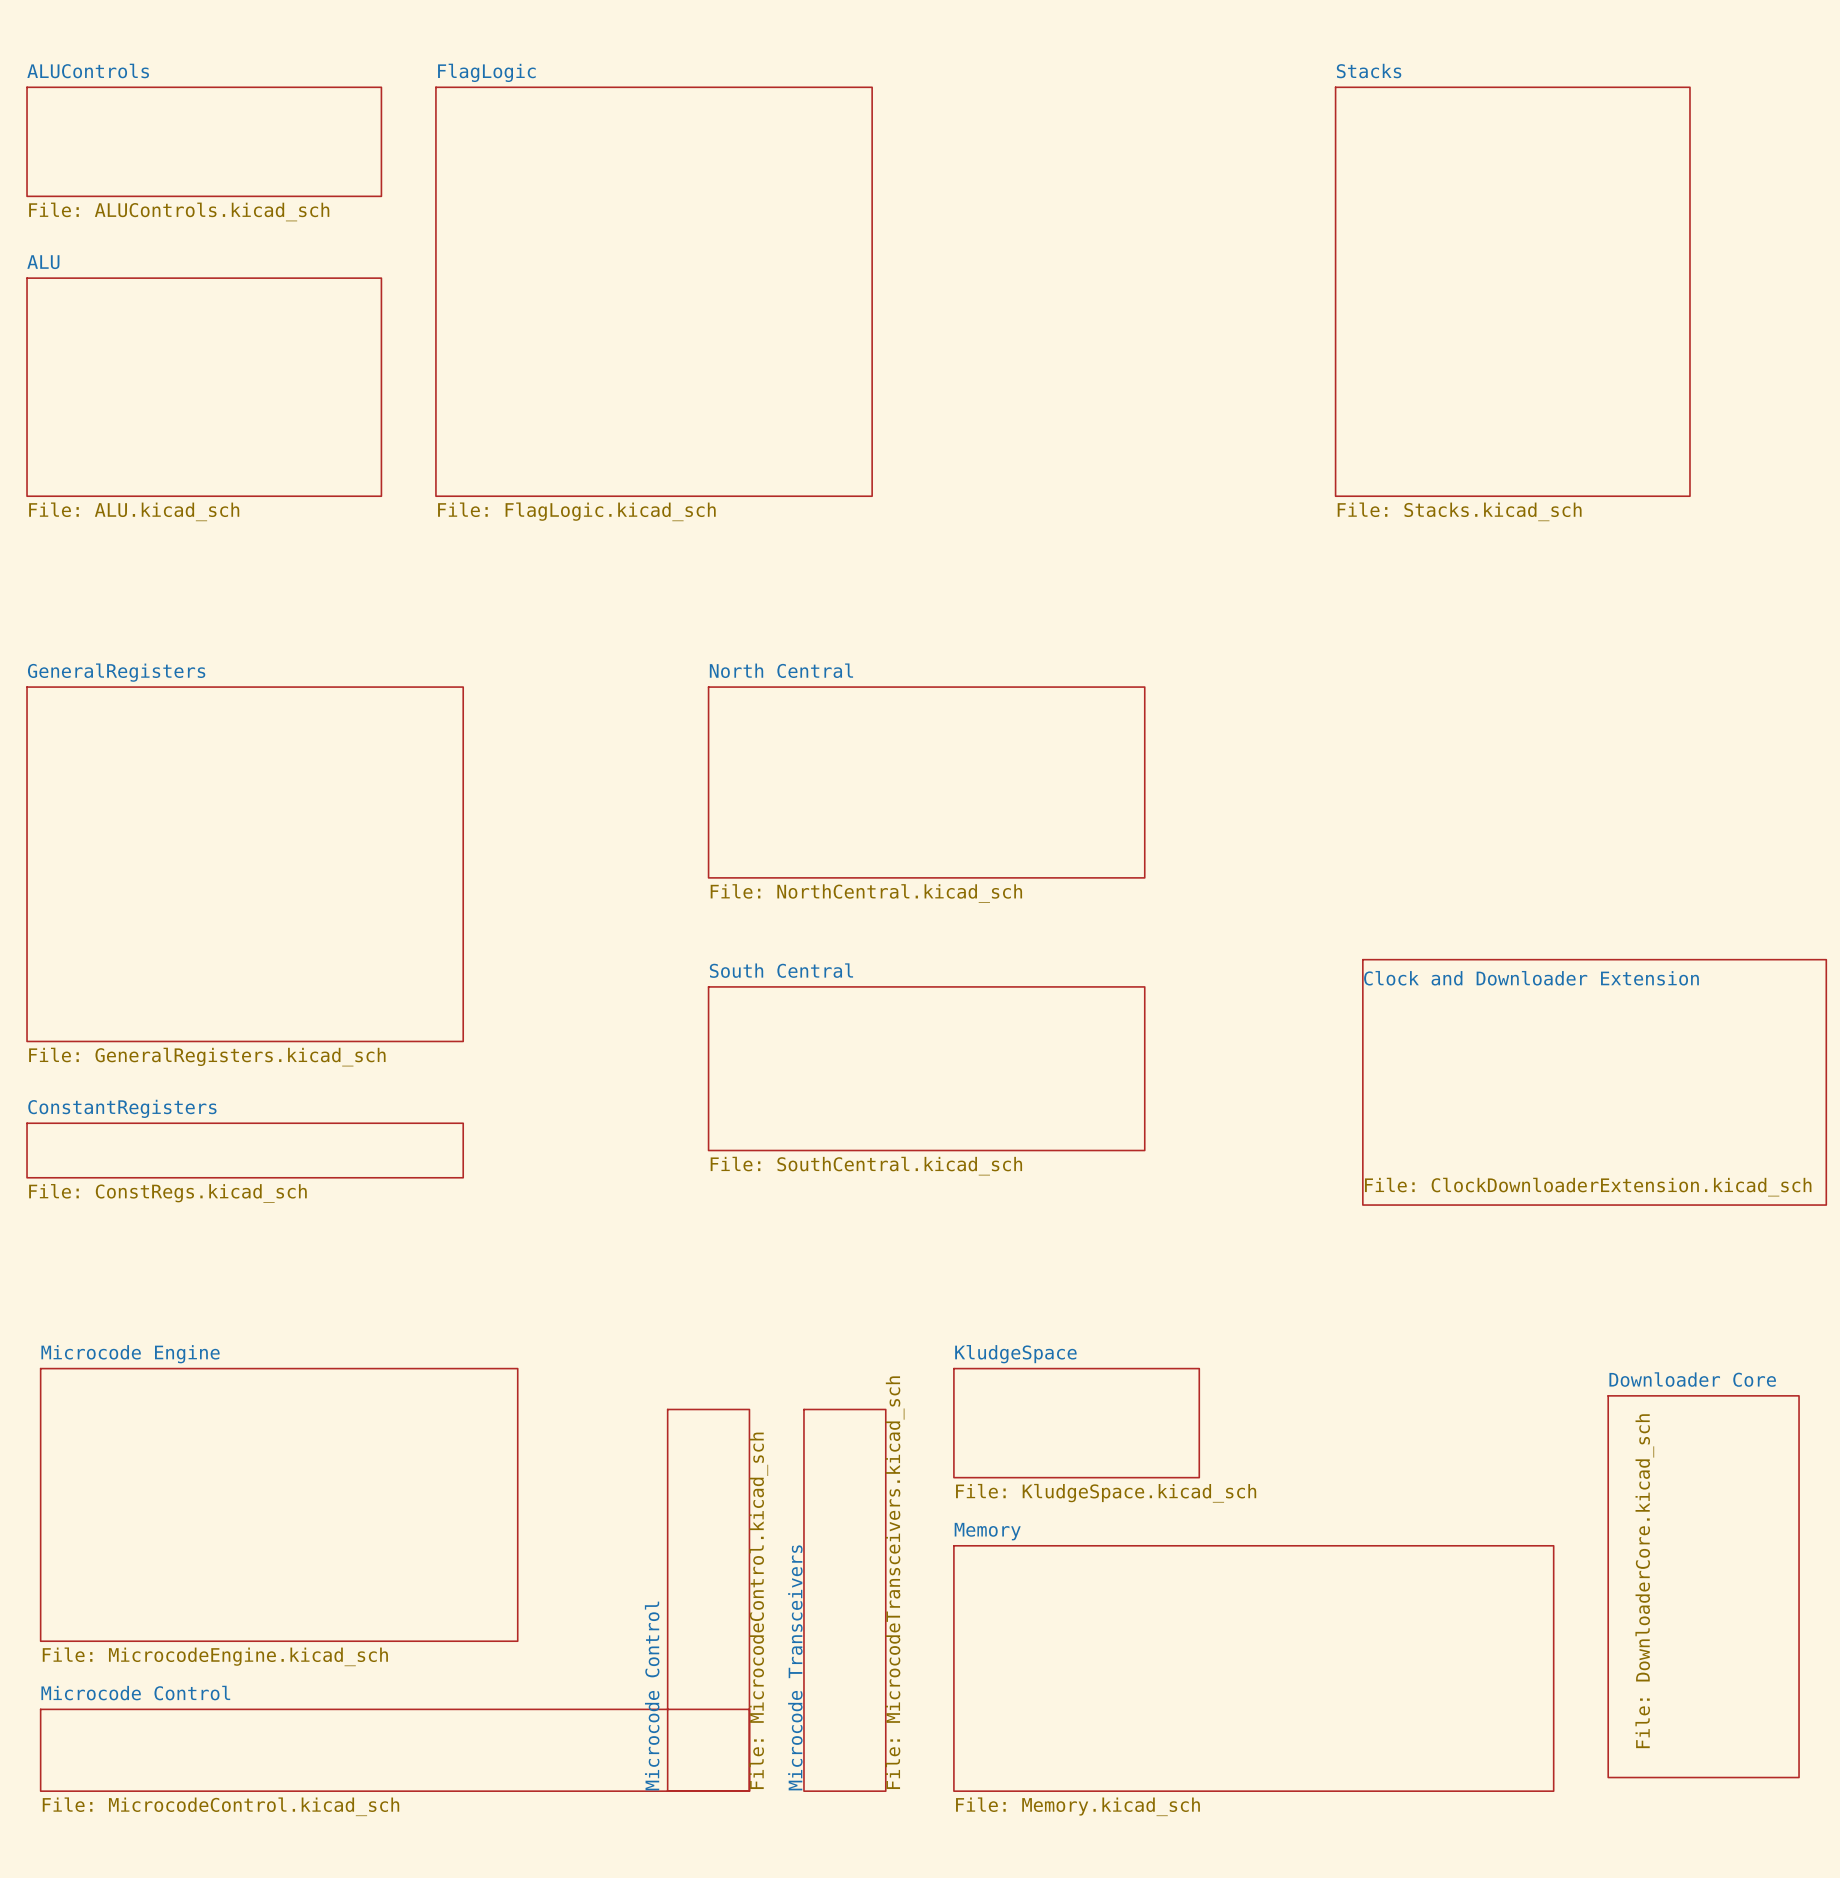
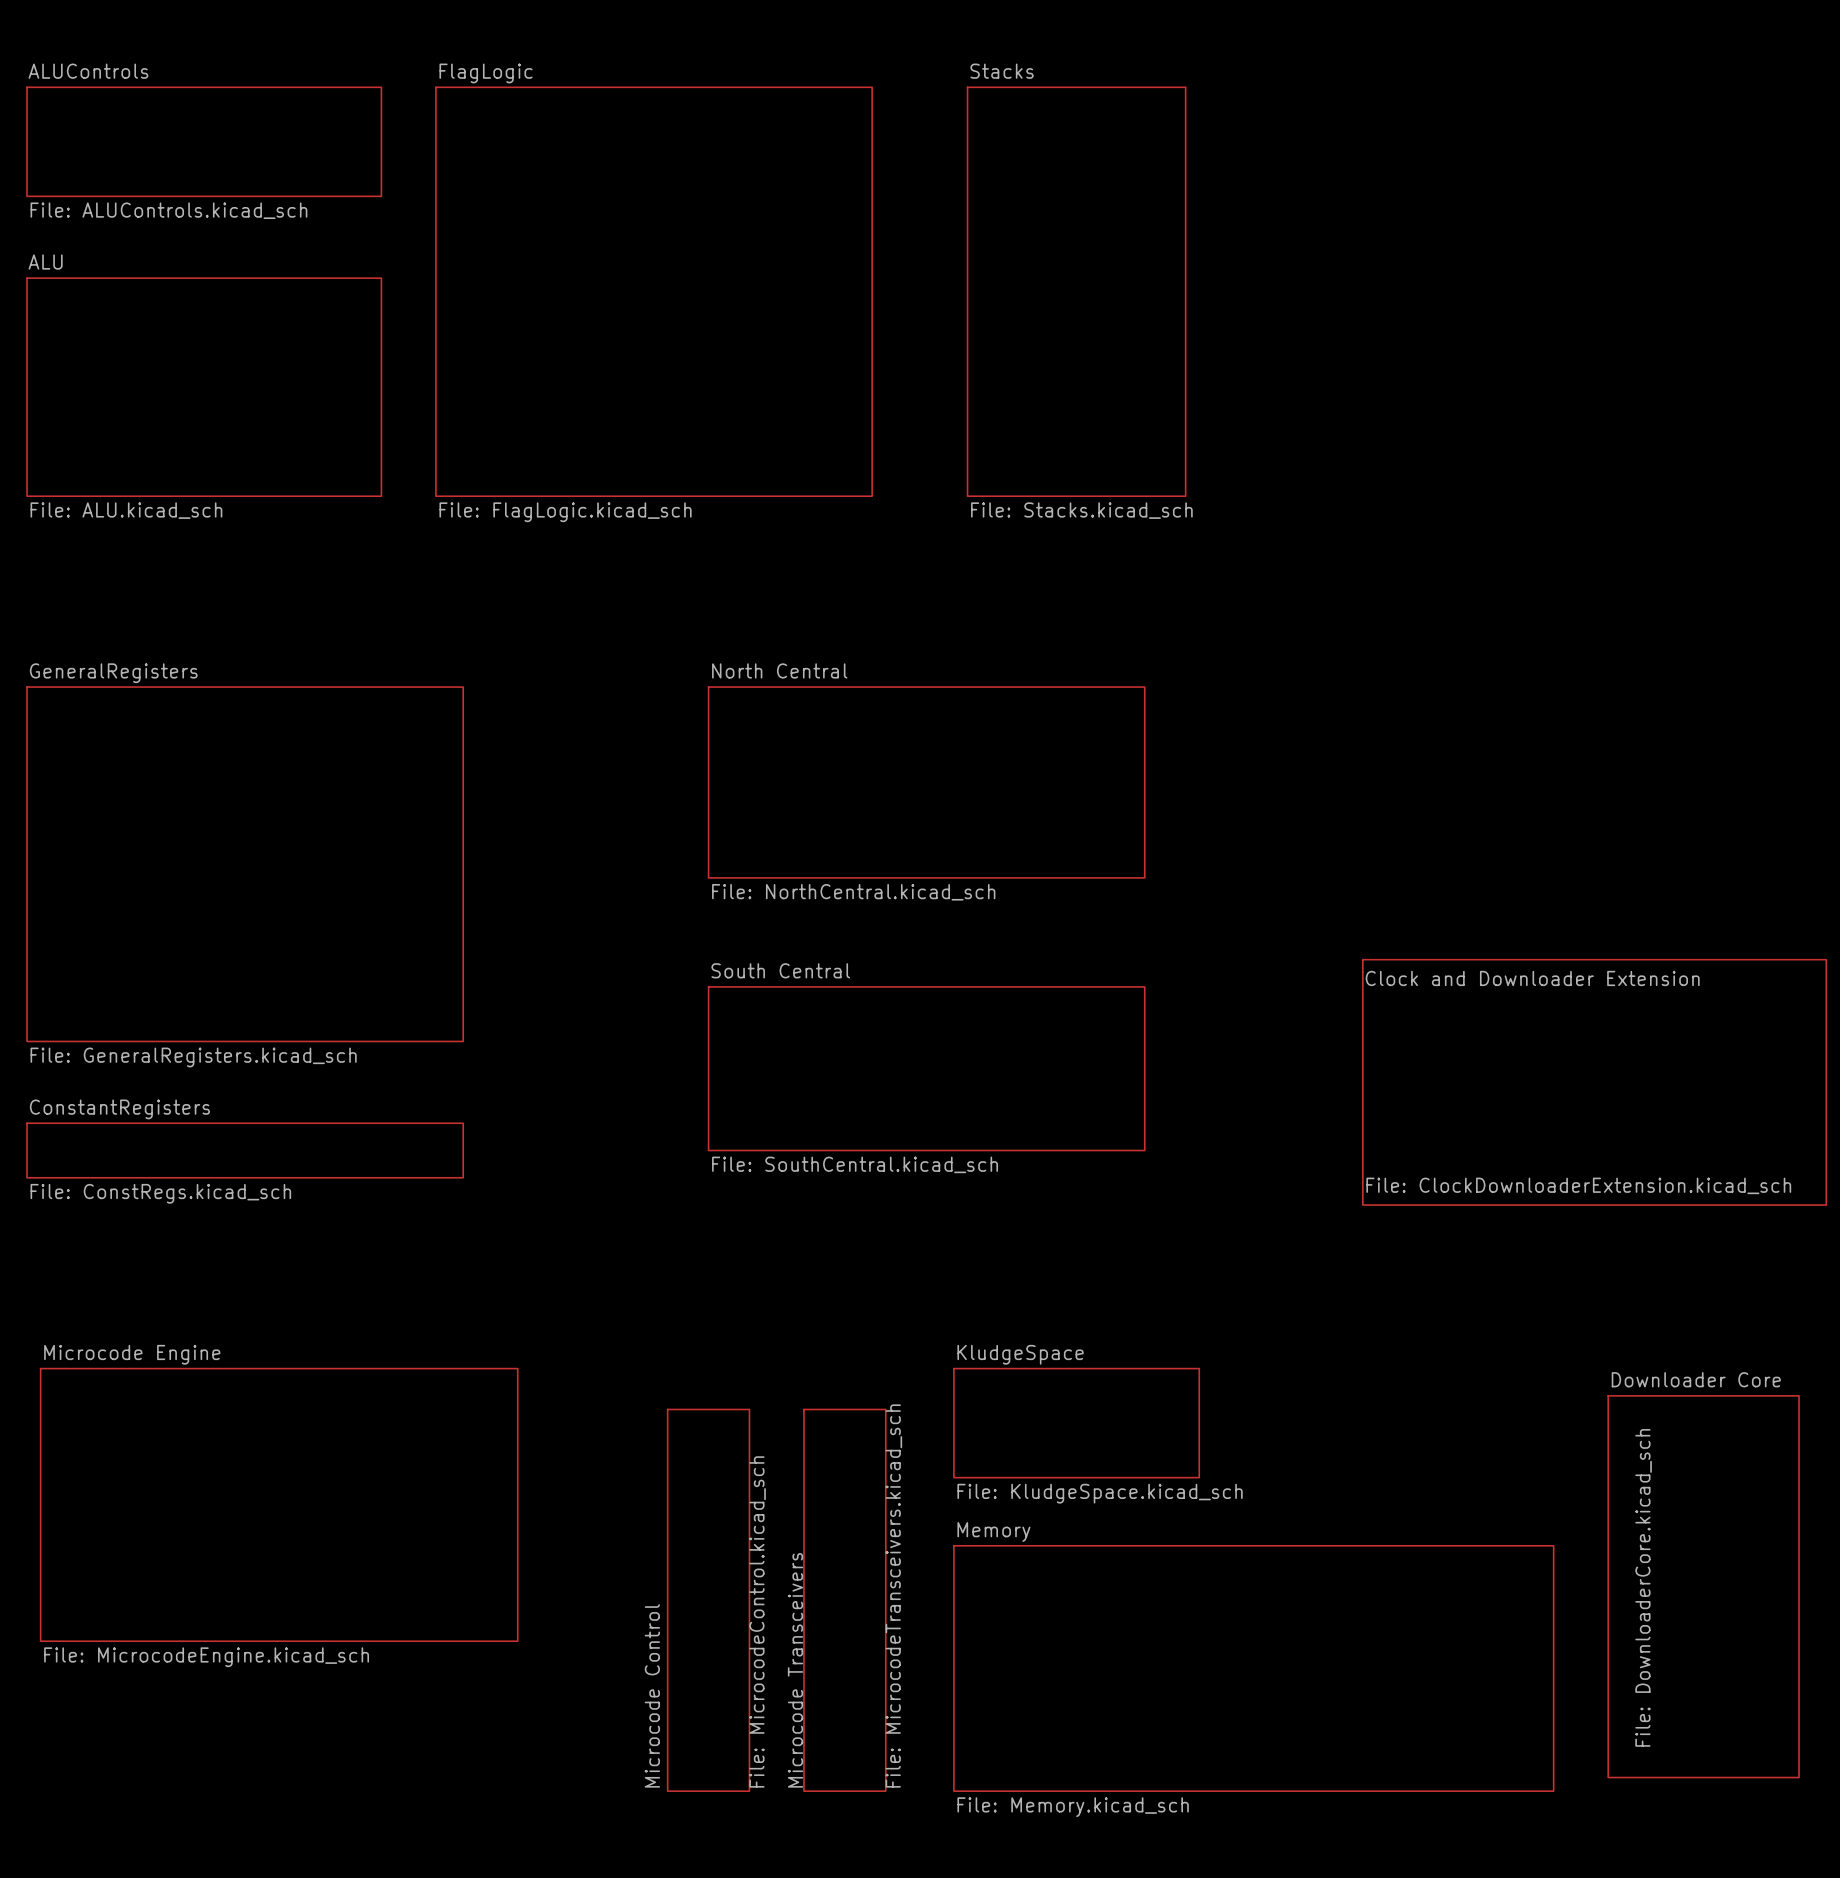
sheet Stacks: none -> File: Stacks.kicad_sch (1076, 291)
sheet Stacks: File: Stacks.kicad_sch (1512, 291) -> none
sheet Microcode Control: File: MicrocodeControl.kicad_sch (395, 1750) -> none

